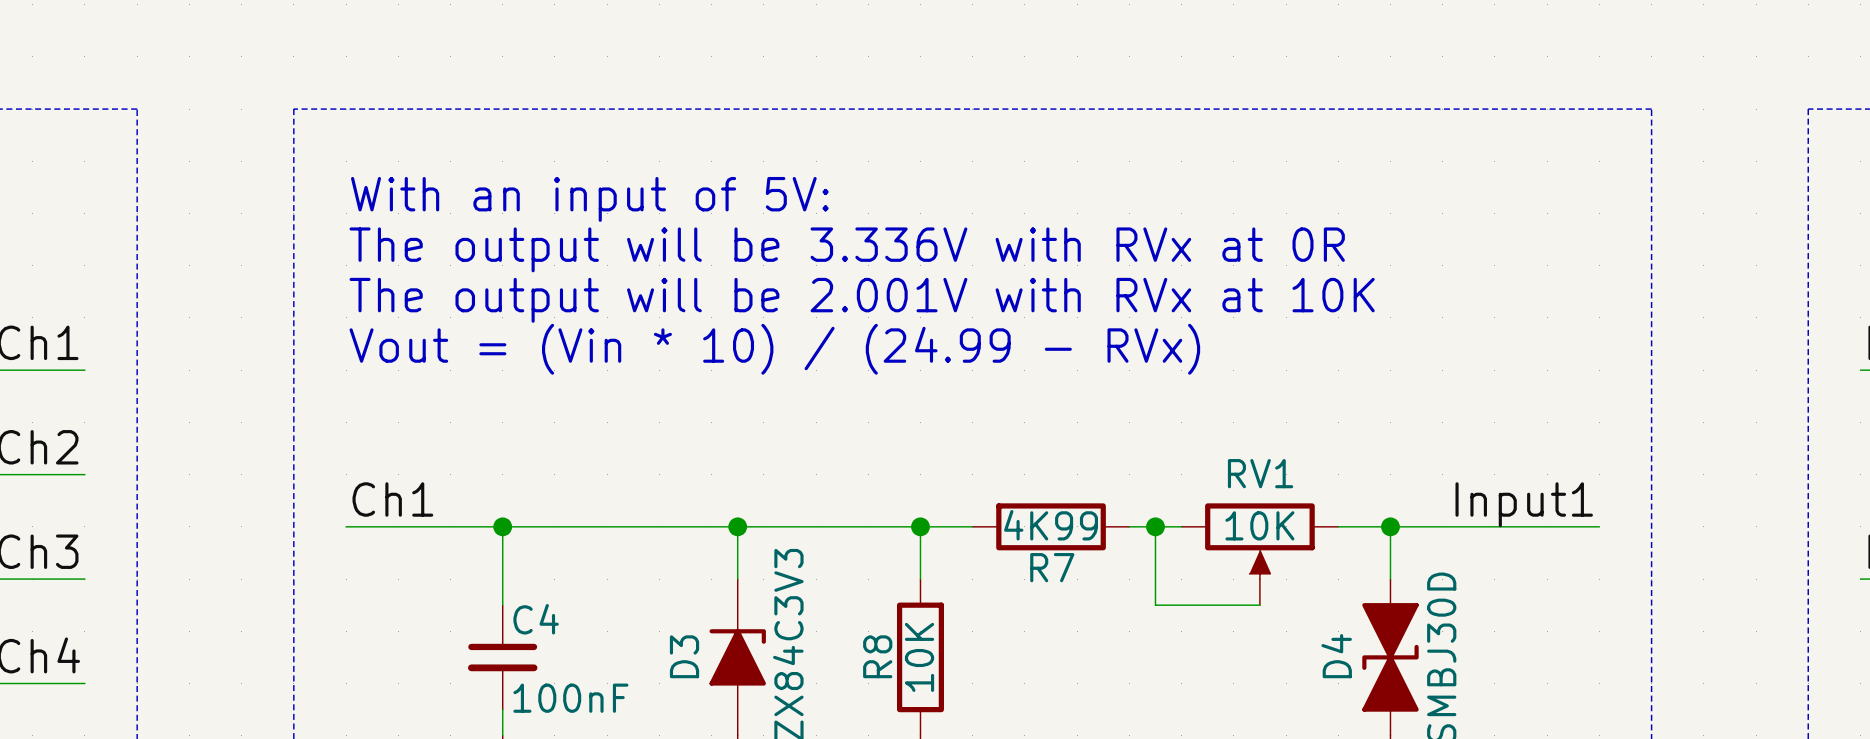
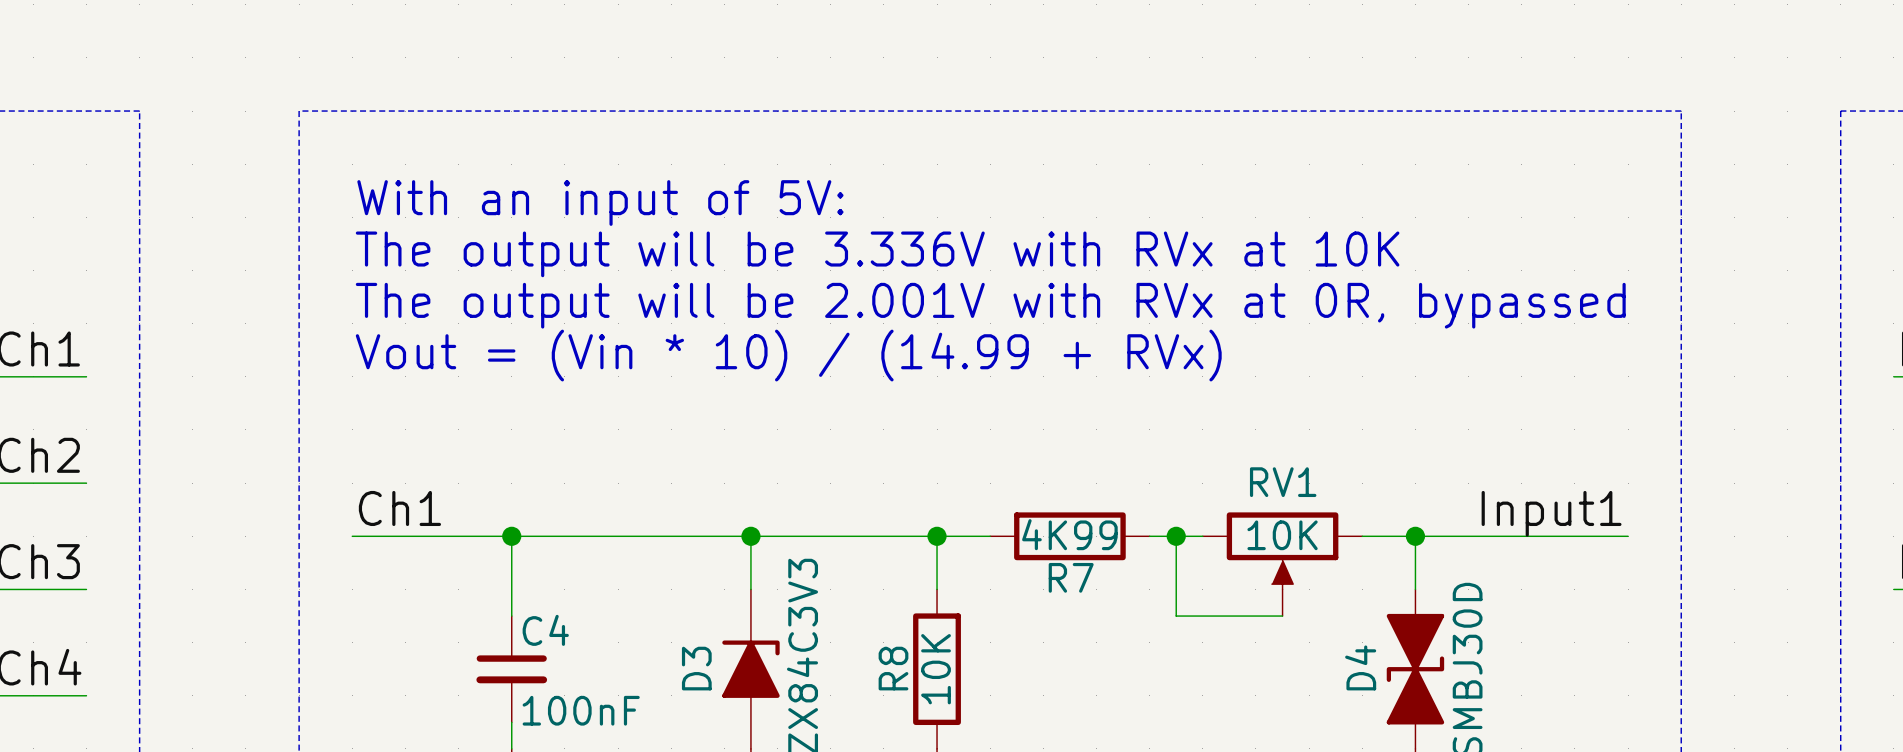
text: The output will be 3.336V with RVx at 0R (847, 249) -> The output will be 3.336V with RVx at 10K (877, 254)
text: The output will be 2.001V with RVx at 10K (862, 300) -> The output will be 2.001V with RVx at 0R, bypassed (990, 305)
text: Vout = (Vin * 10) / (24.99 - RVx) (774, 349) -> Vout = (Vin * 10) / (14.99 + RVx) (788, 355)

